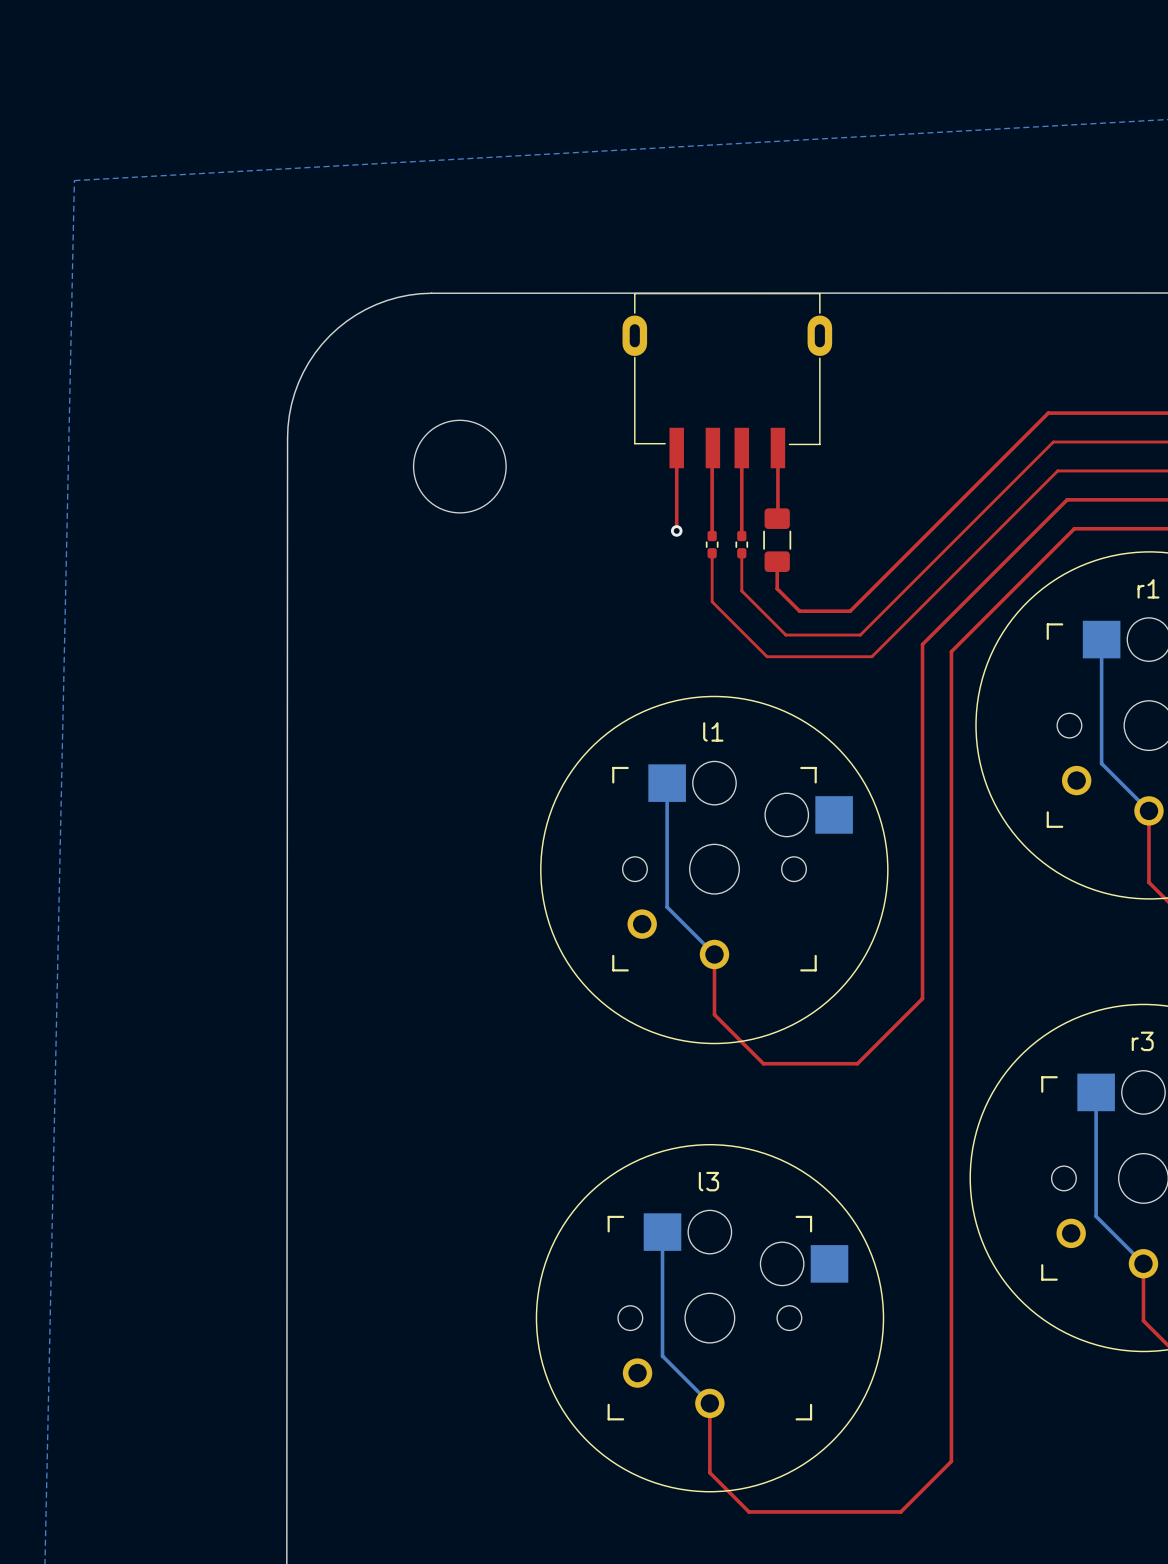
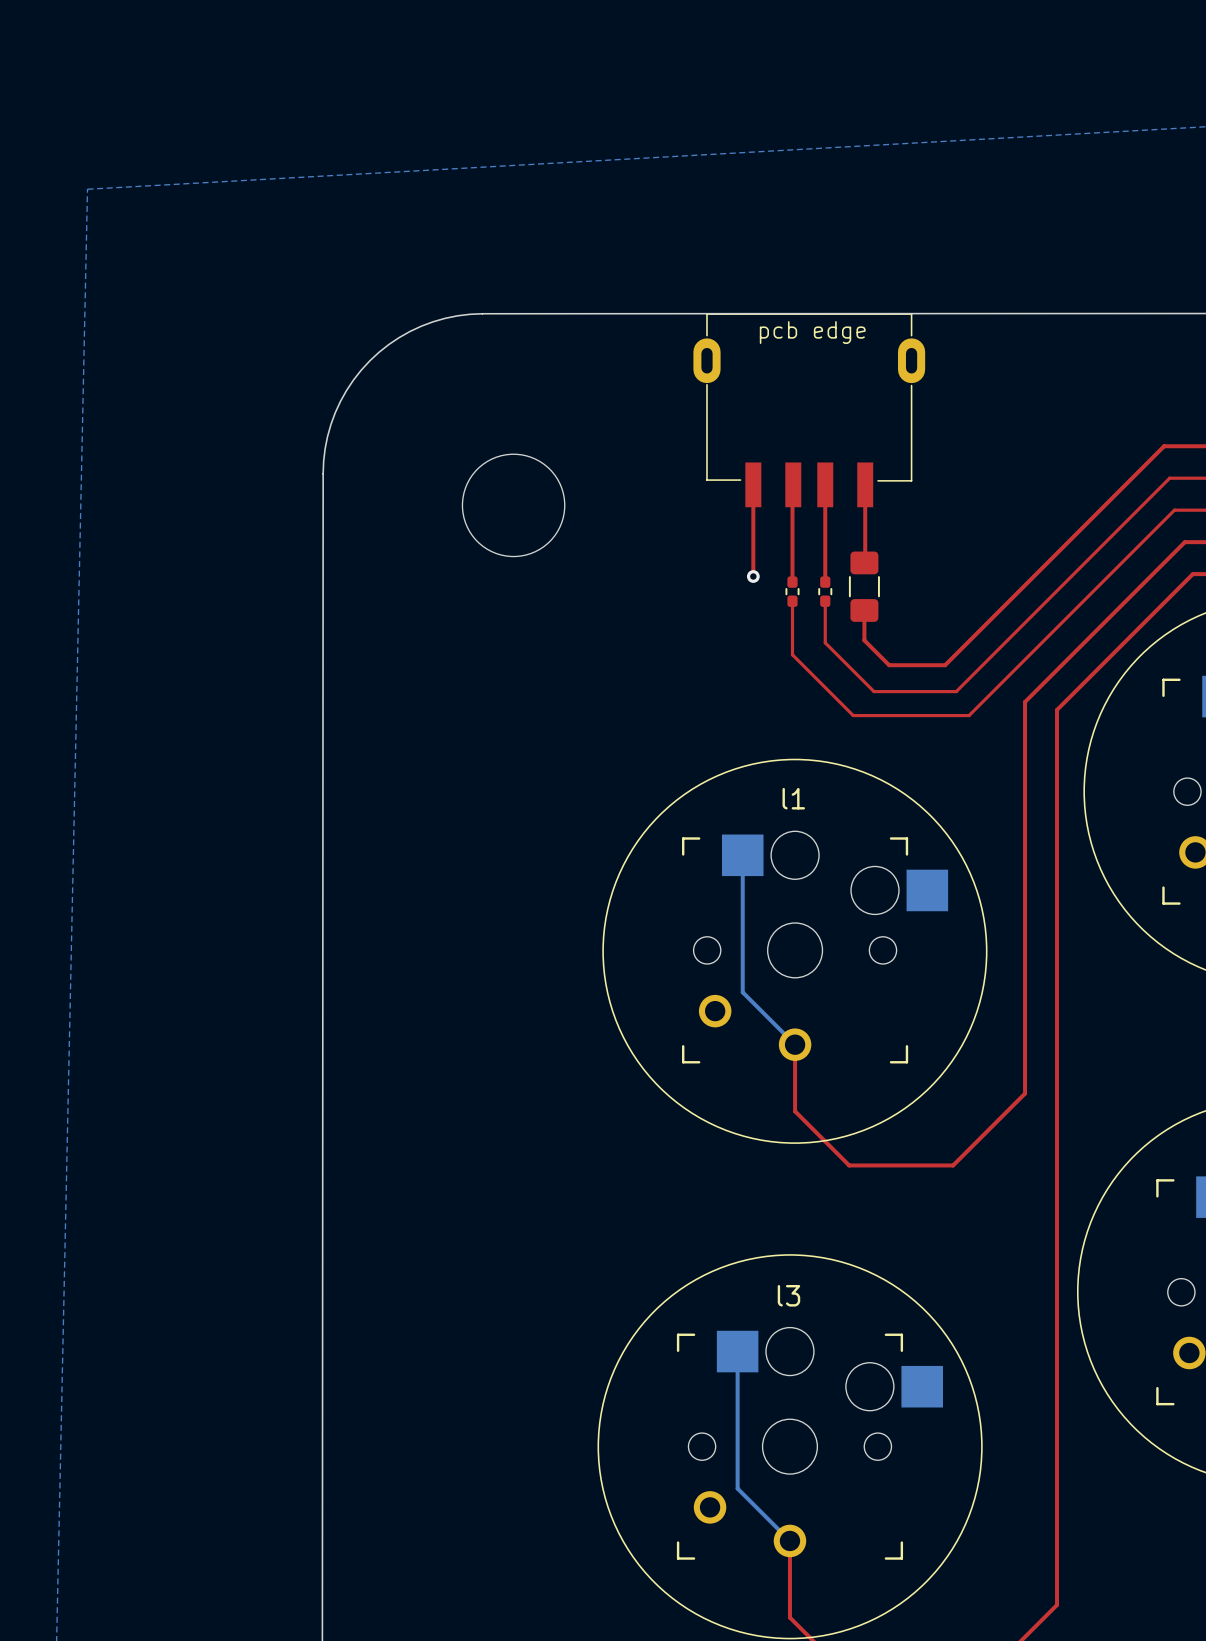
part text: none -> pcb edge (812, 332)

